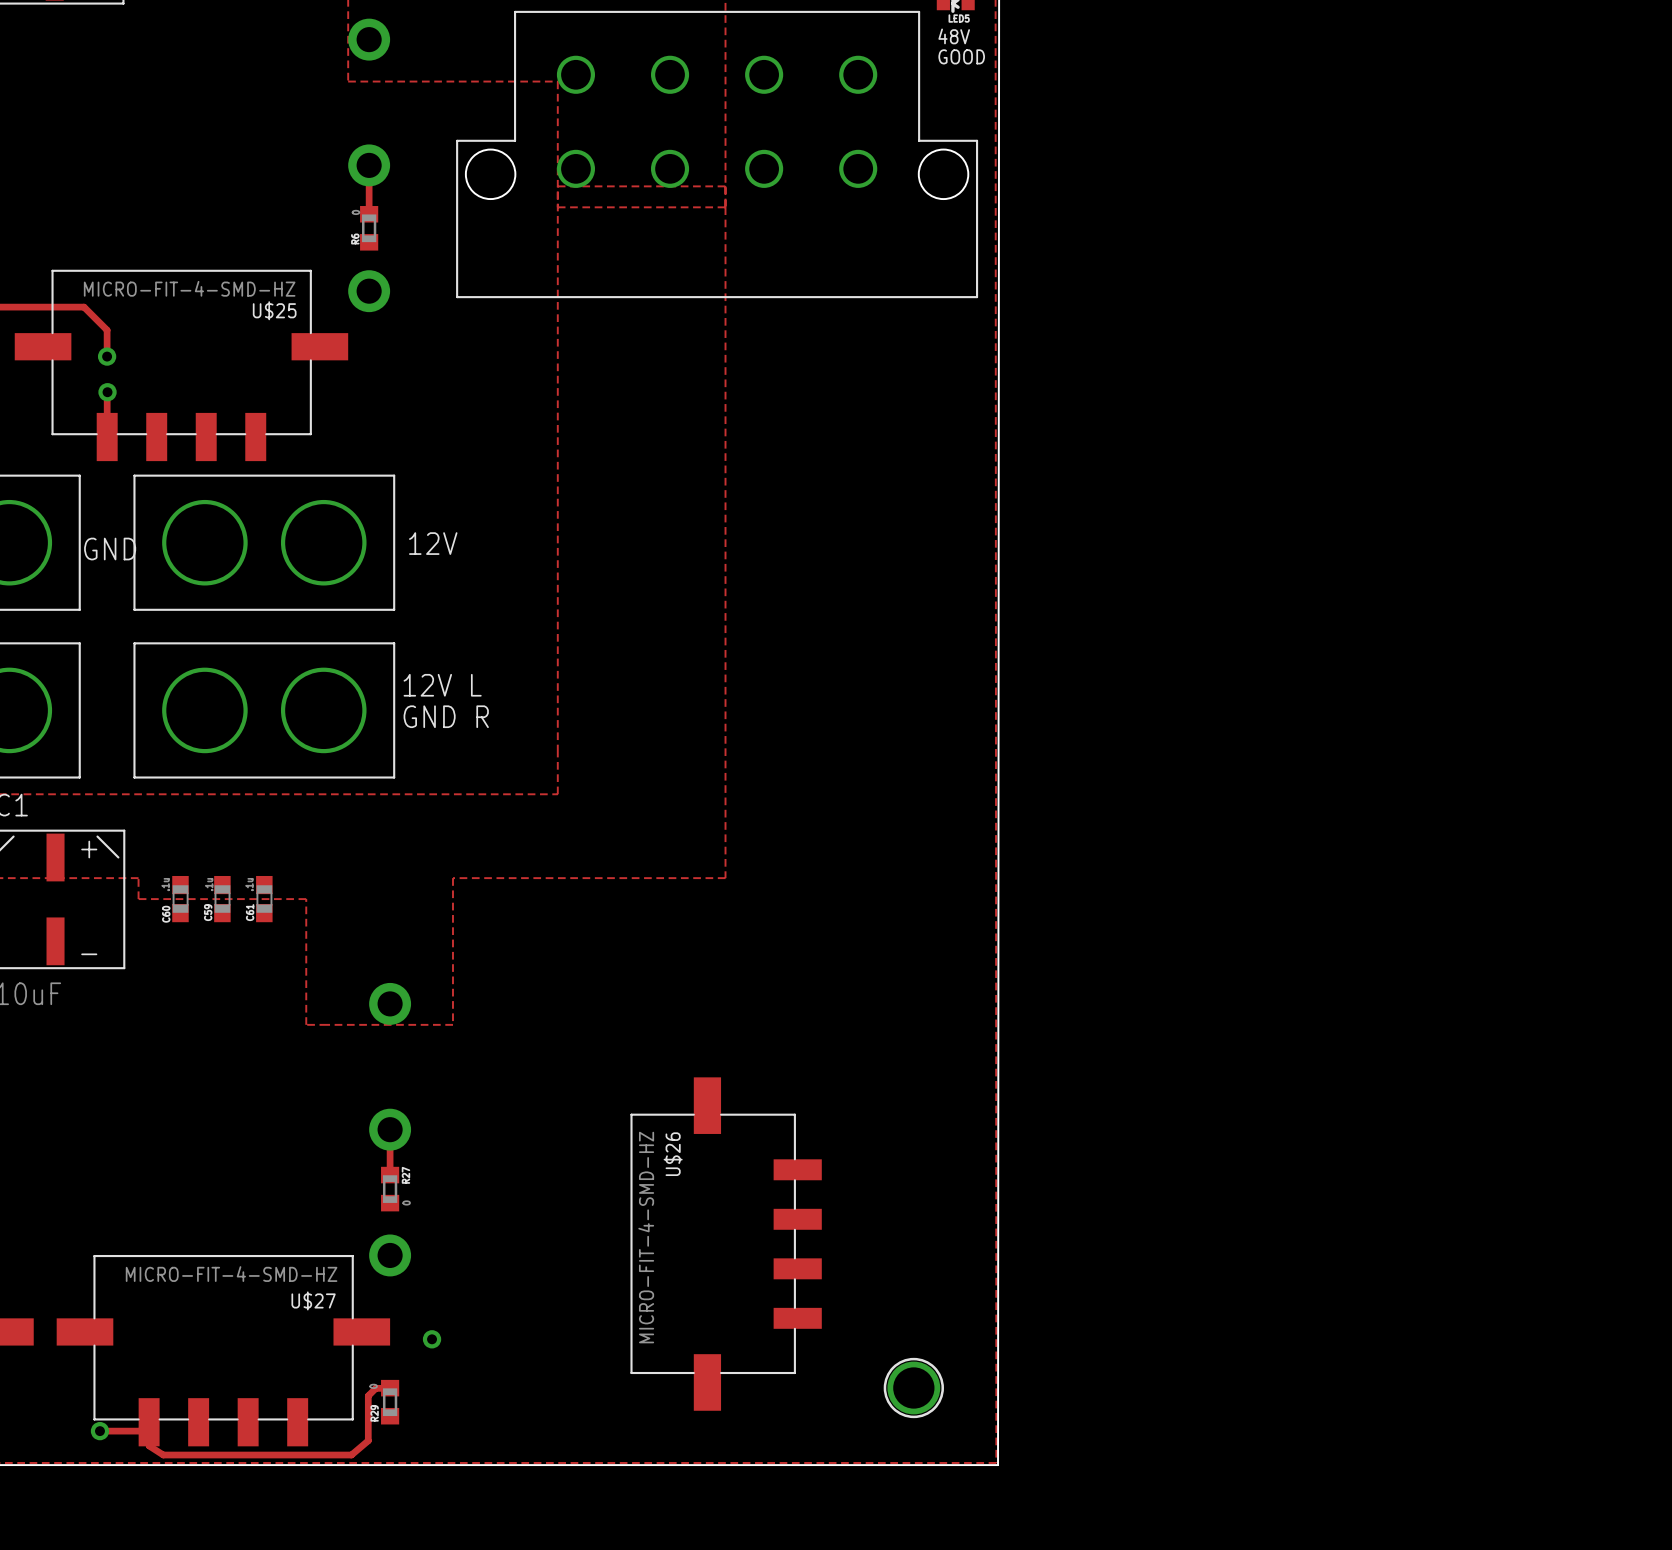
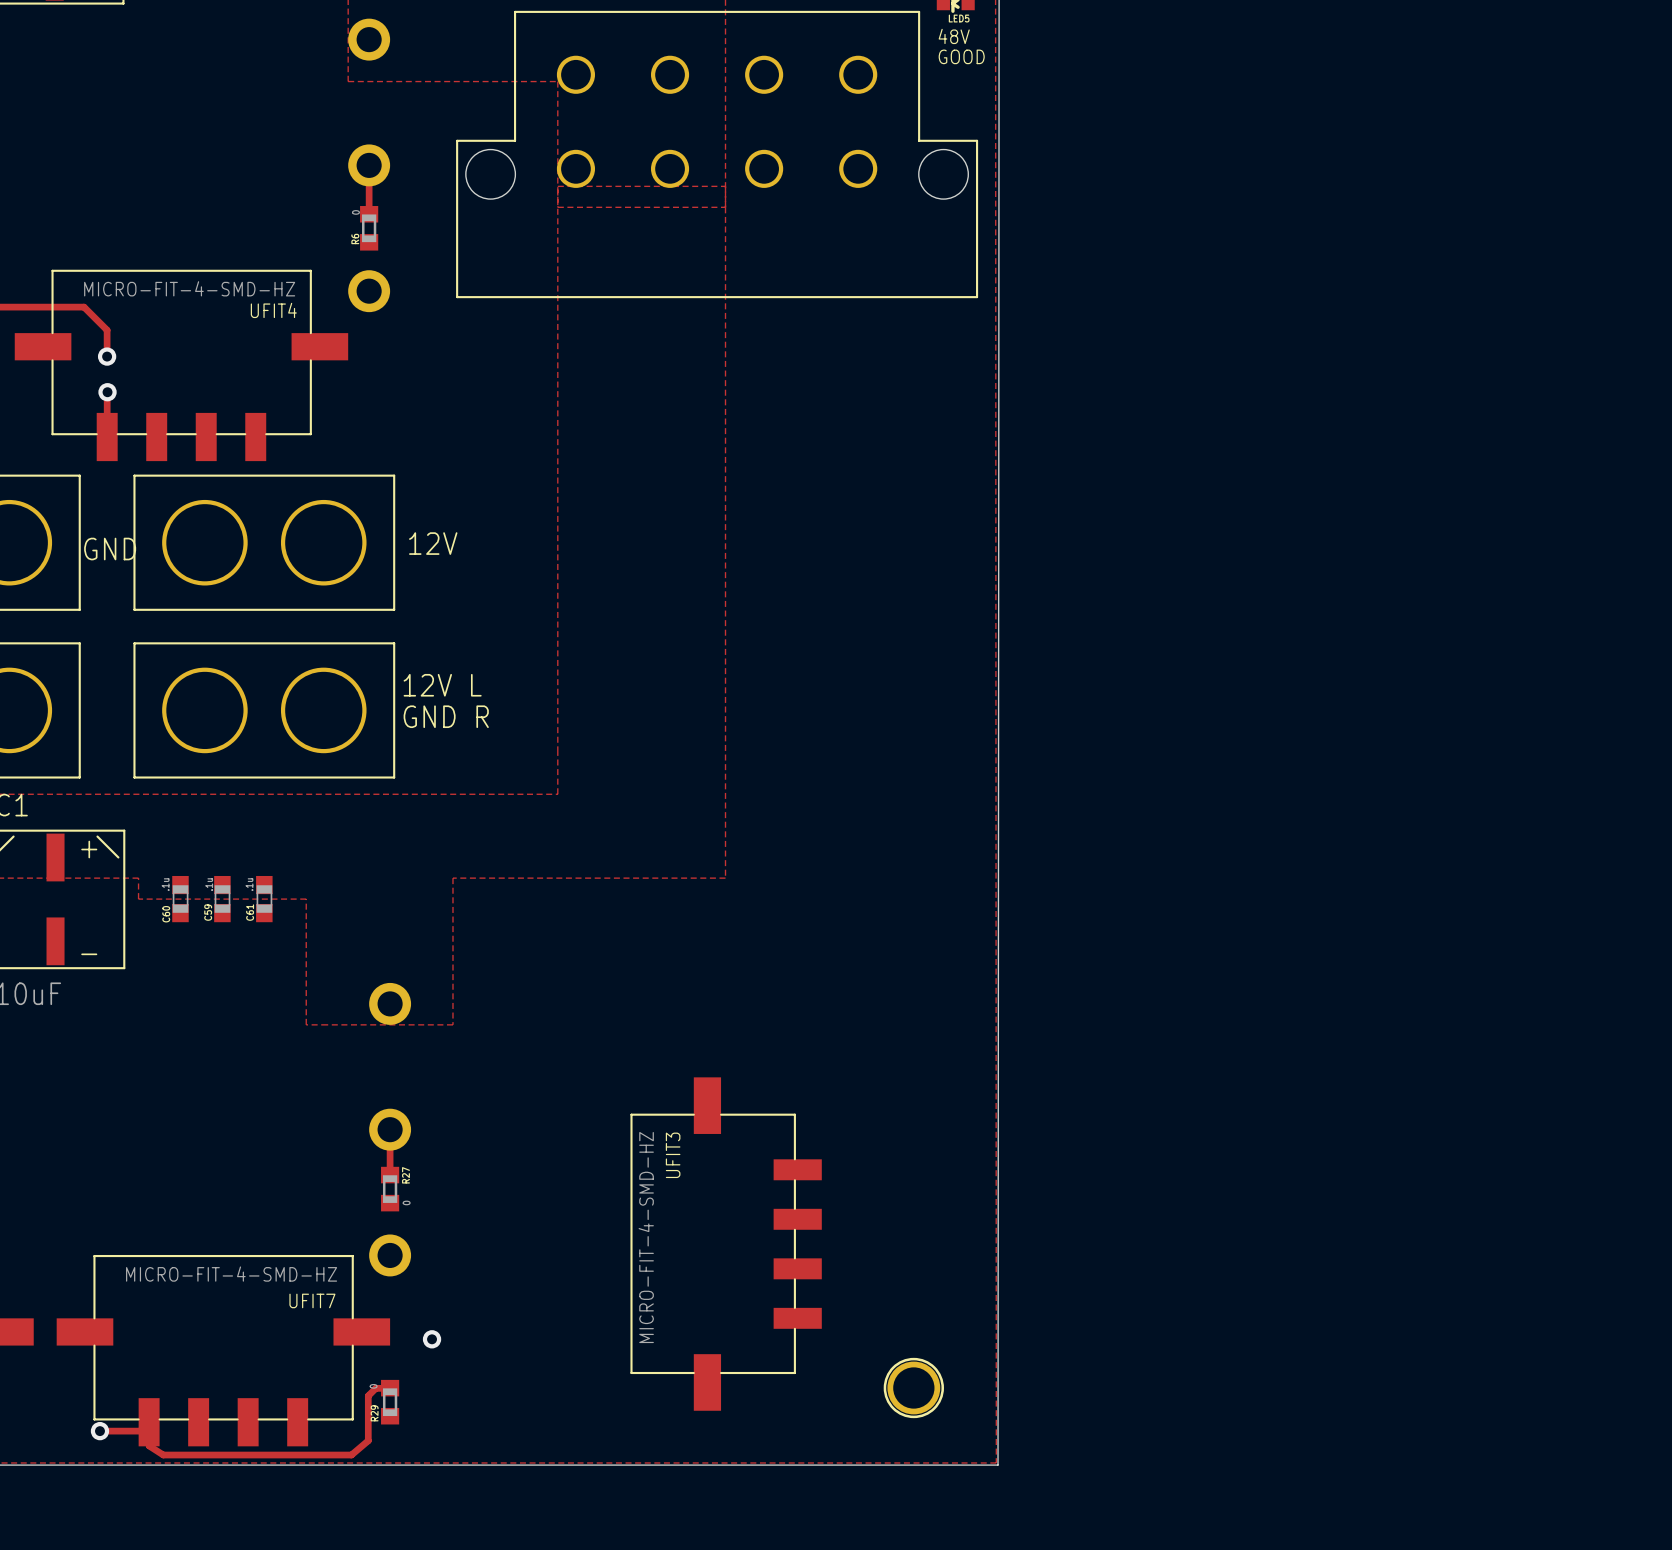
U$25 name: U$25 (274, 310) -> UFIT4 (273, 310)
U$26 name: U$26 (673, 1154) -> UFIT3 (673, 1155)
U$27 name: U$27 (313, 1300) -> UFIT7 (312, 1300)

